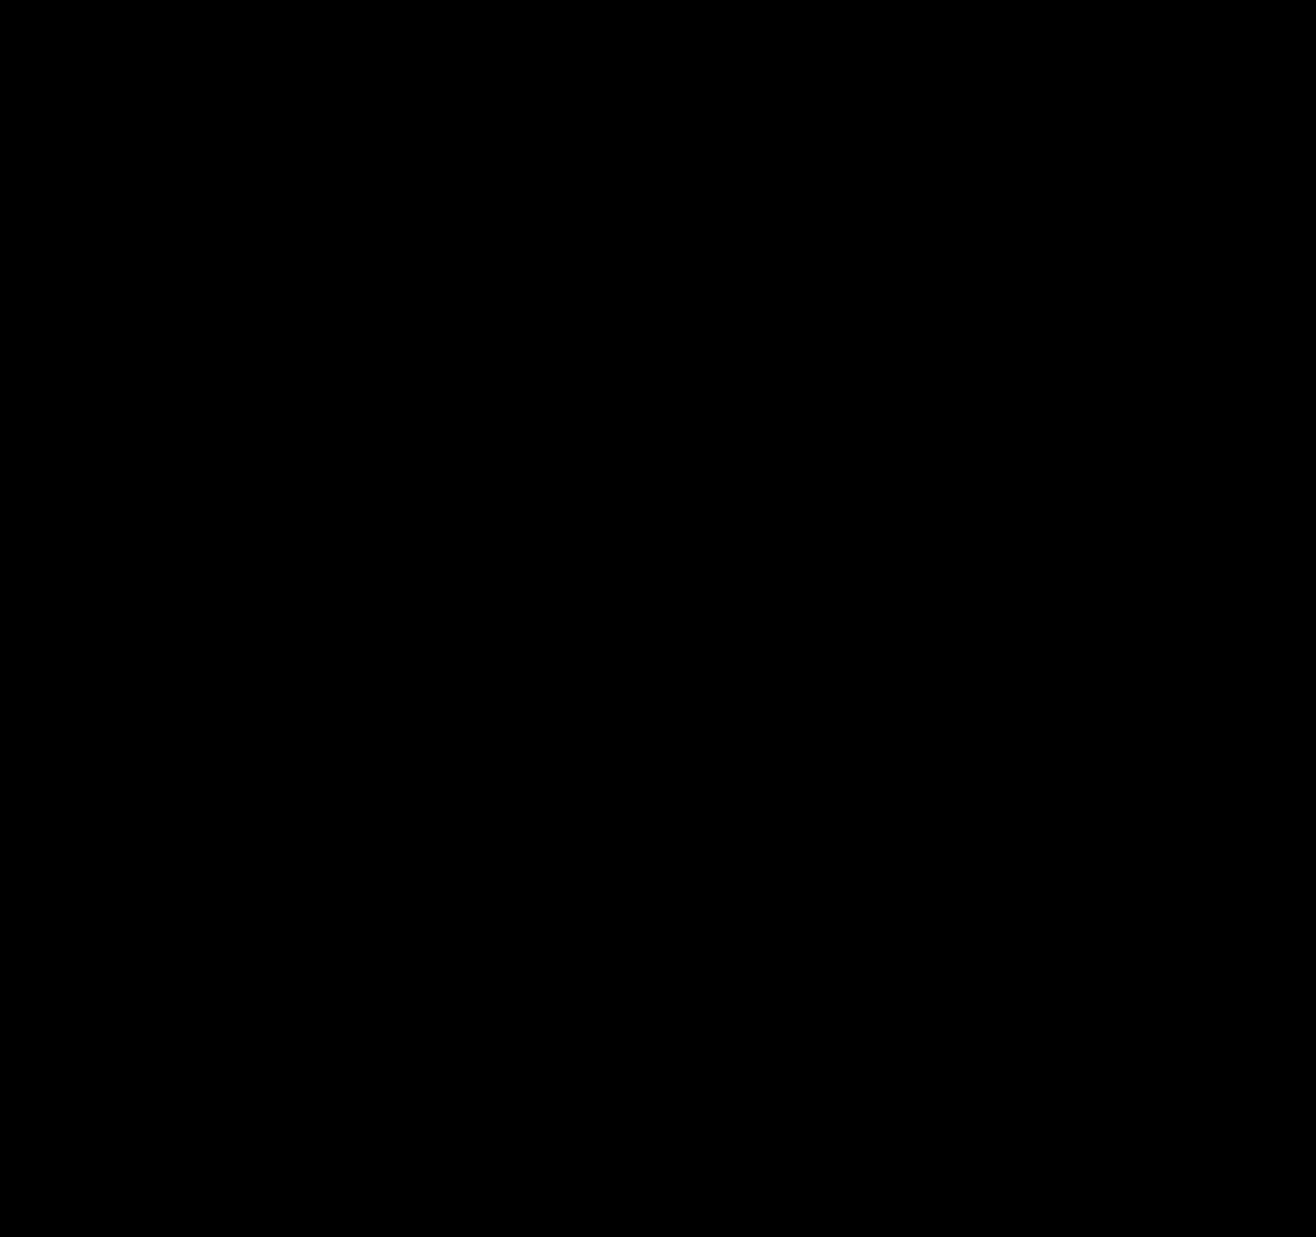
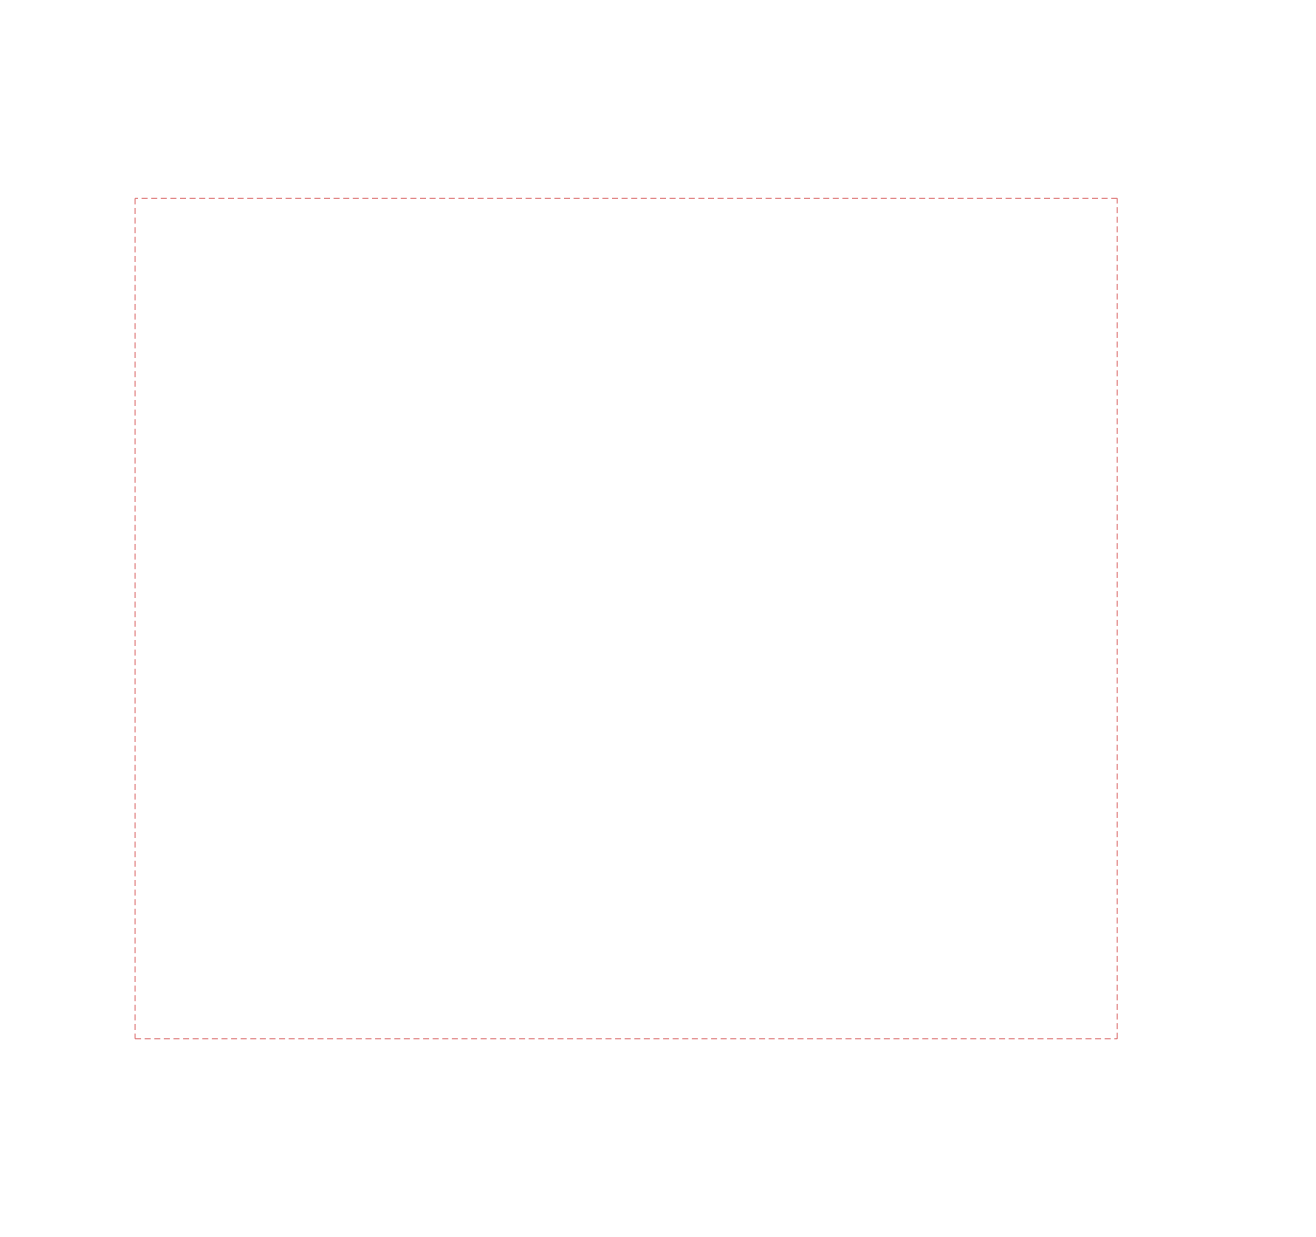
top zone outline: none -> (135, 198) (135, 1038) (1117, 1038) (1117, 198) (135, 198)

